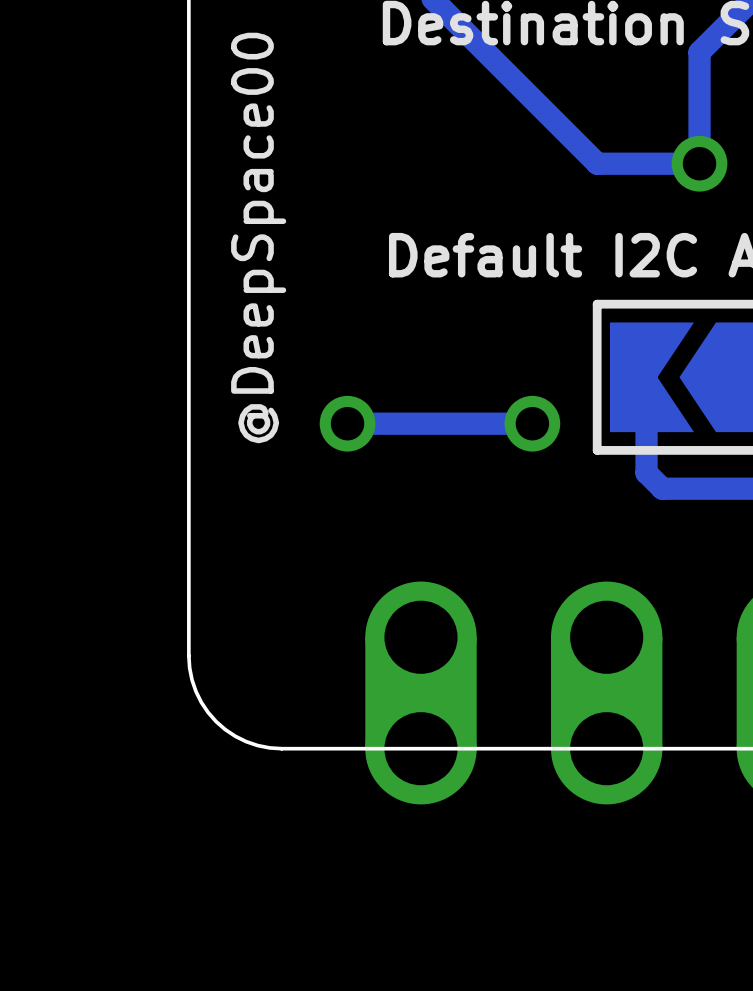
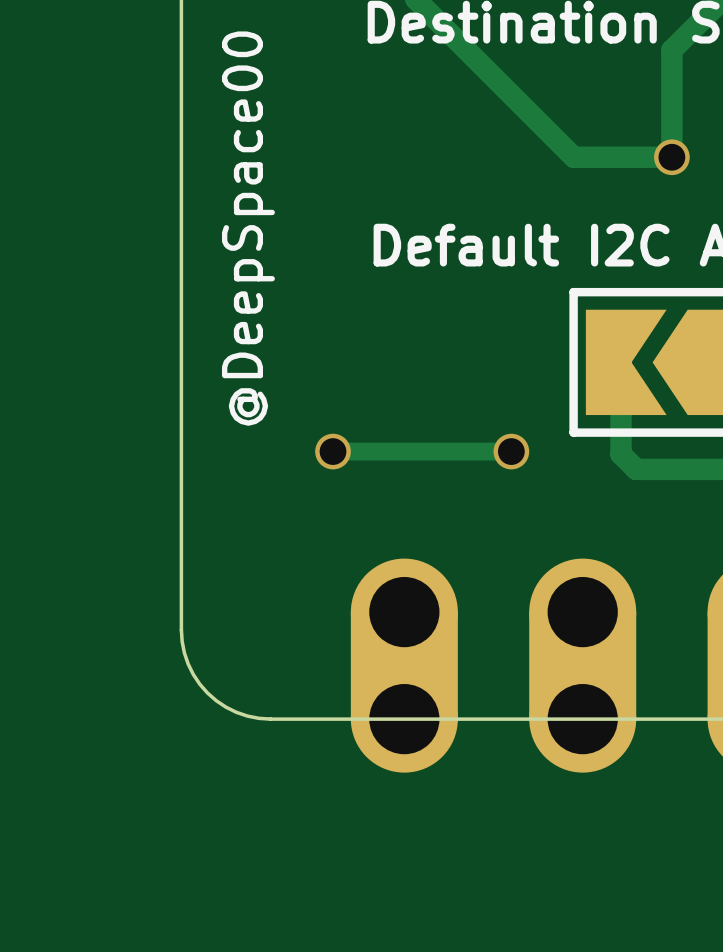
via size: [671, 135, 728, 192] -> [654, 139, 690, 176]
via position: (347, 423) -> (333, 451)
track: (532, 423) (347, 423) -> (511, 451) (333, 451)
via position: (532, 423) -> (511, 451)

